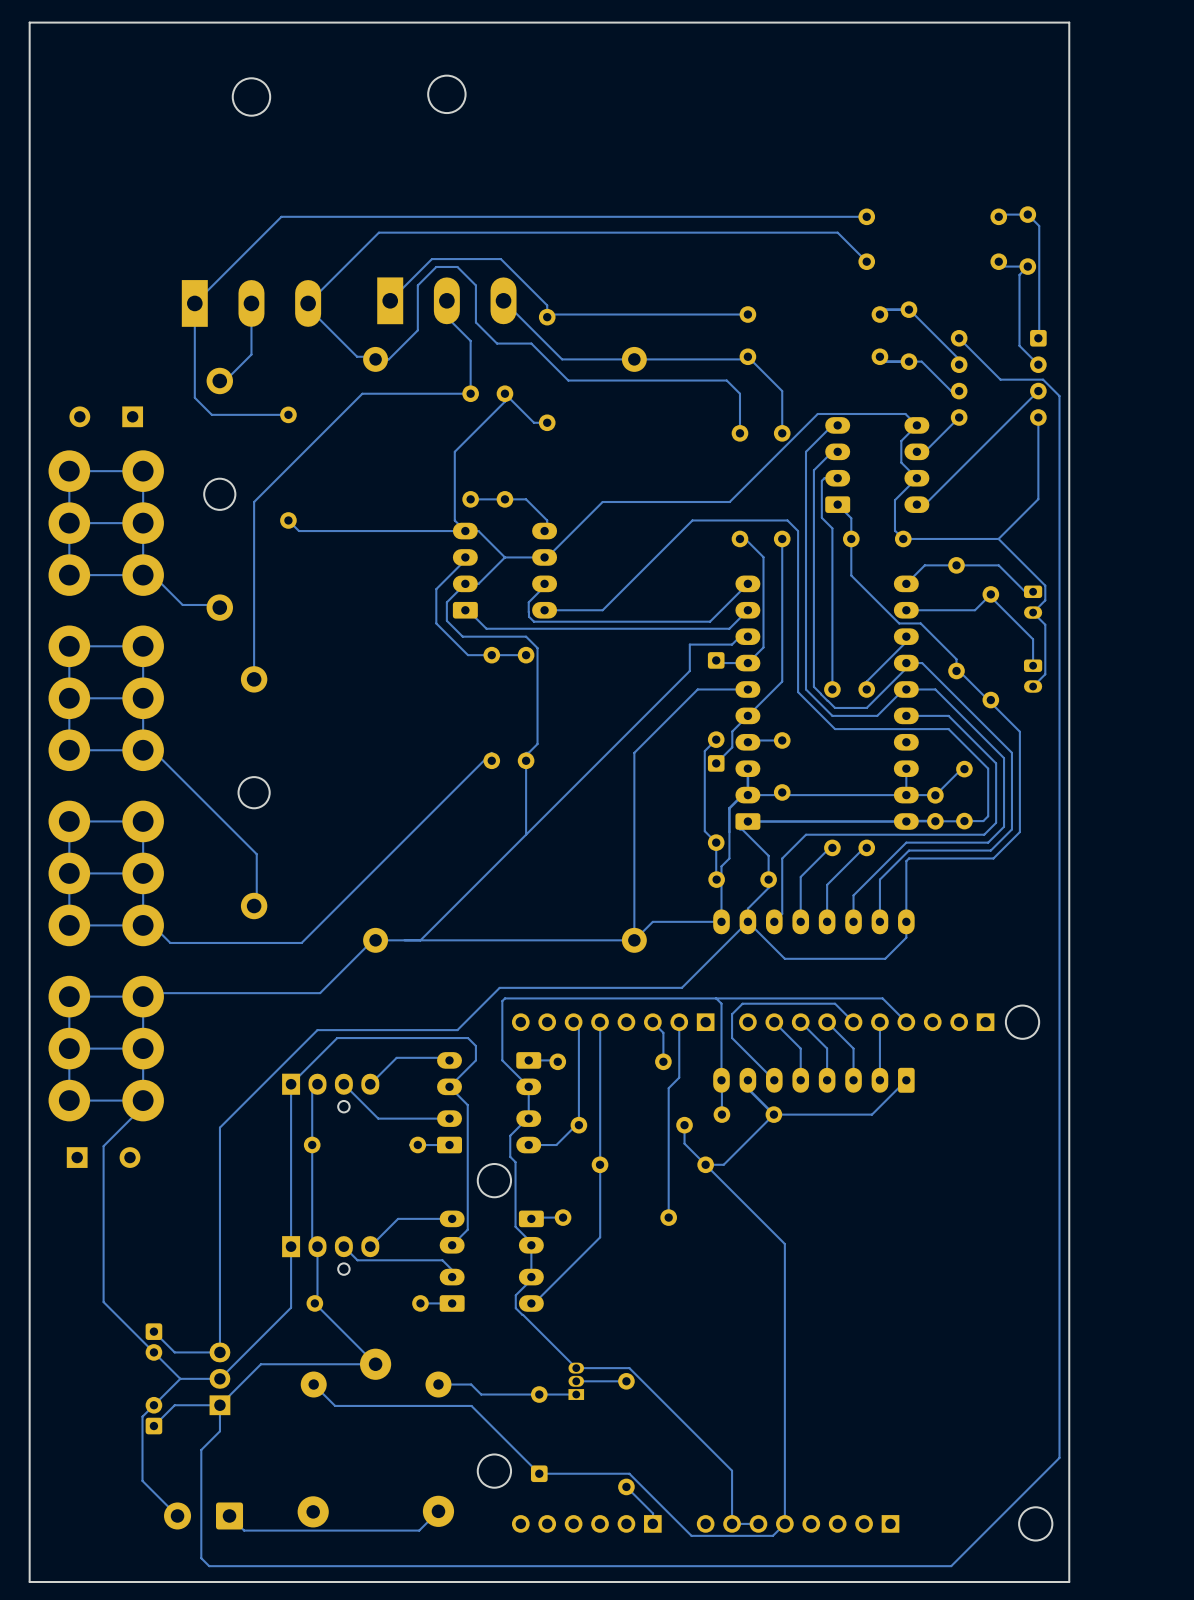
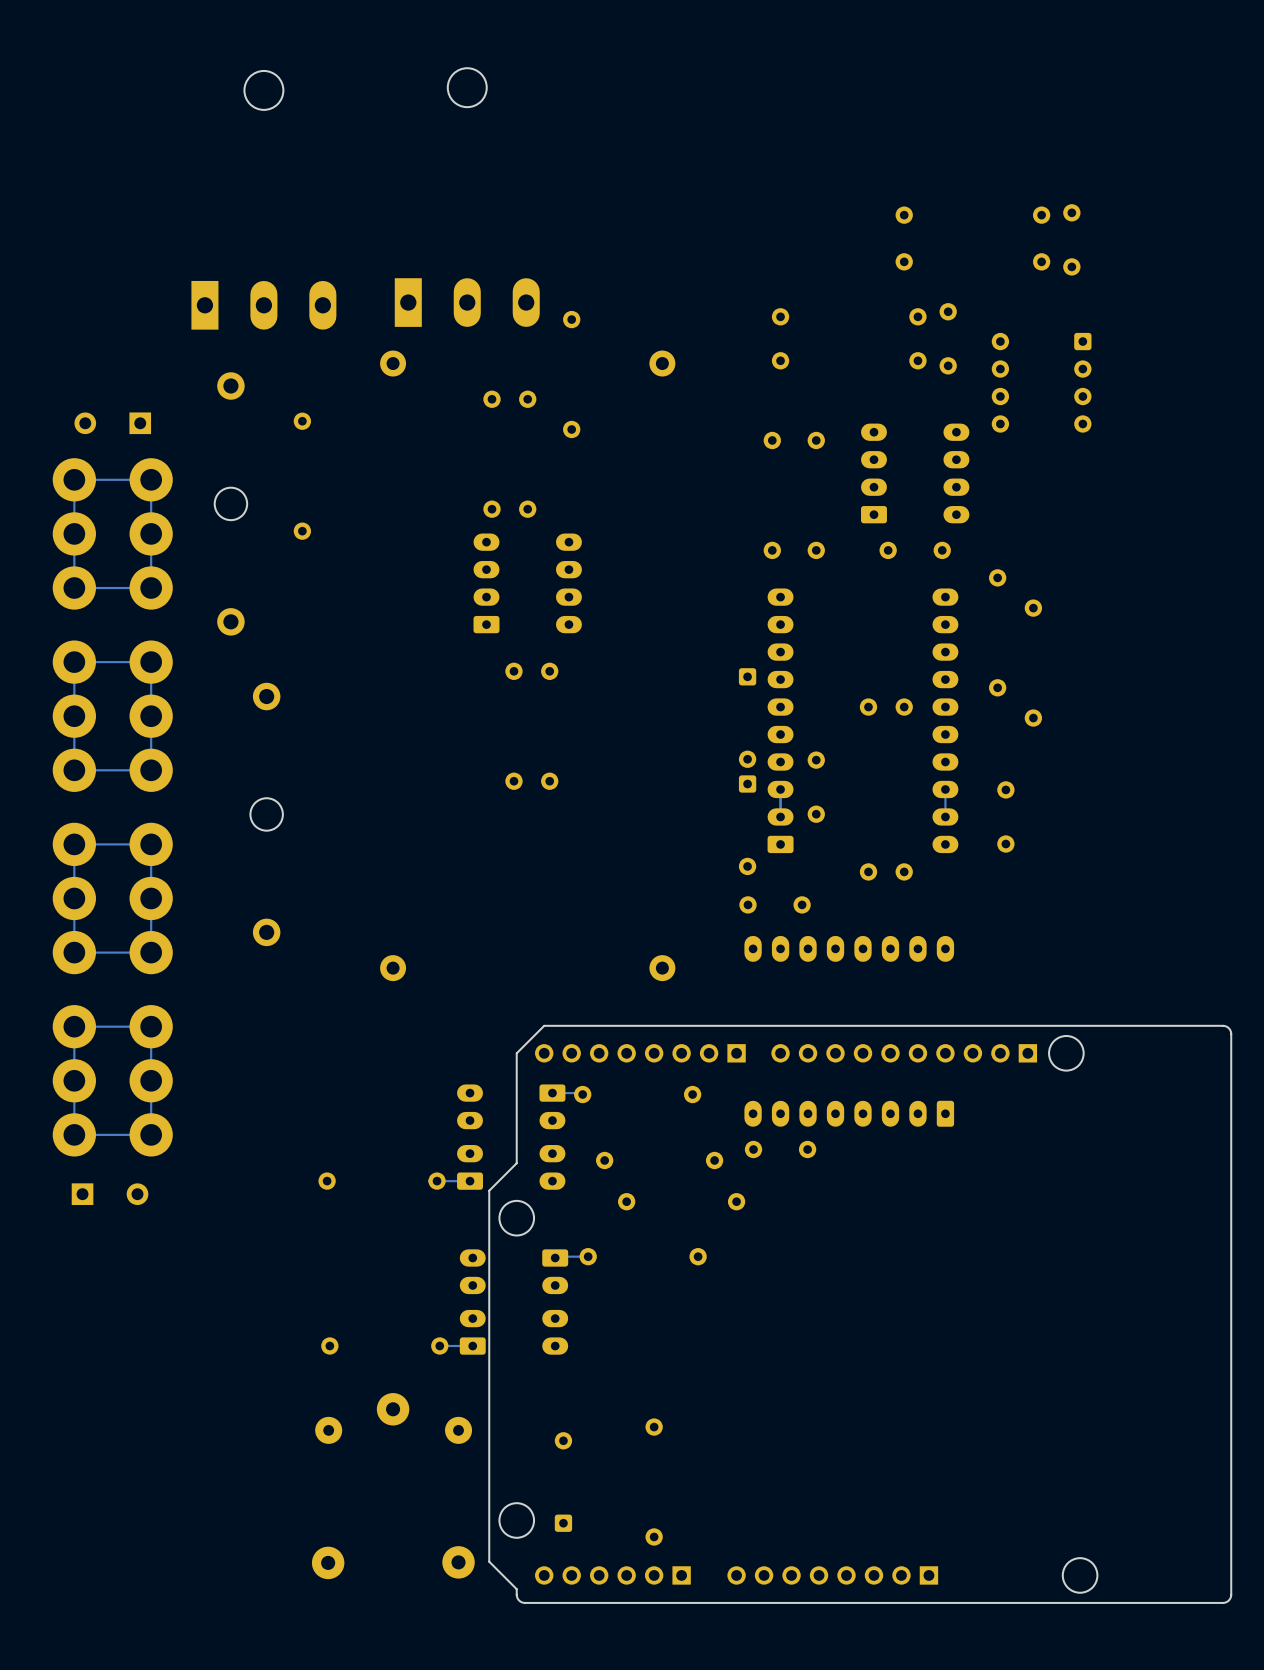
board edge: (1069, 22) (29, 22) (29, 1582) (1069, 1582) (1069, 22) -> none
track: (866, 216) (281, 216) (194, 303) (194, 397) (211, 414) (288, 414) -> none
track: (998, 216) (1000, 214) (1027, 214) (1039, 226) (1038, 338) -> none
track: (866, 261) (837, 232) (378, 232) (308, 303) (308, 307) (357, 356) (378, 356) -> none
track: (998, 261) (1003, 266) (1027, 266) (1019, 274) (1019, 345) (1038, 364) -> none
track: (390, 300) (431, 259) (500, 259) (547, 305) (547, 317) (549, 314) (747, 314) -> none
track: (446, 300) (446, 317) (470, 340) (470, 393) (362, 393) (254, 501) (254, 679) (256, 679) -> none
track: (503, 300) (562, 359) (750, 359) (782, 391) (782, 433) -> none
track: (251, 303) (251, 354) (227, 378) -> none
track: (882, 309) (909, 309) (959, 359) (959, 364) -> none
track: (959, 338) (1000, 379) (1043, 379) (1059, 396) (1059, 1457) (951, 1566) (209, 1566) (201, 1558) (201, 1449) (219, 1431) (219, 1405) -> none
track: (375, 359) (388, 359) (417, 330) (417, 285) (436, 266) (457, 266) (475, 285) (475, 322) (497, 343) (531, 343) (568, 380) (726, 380) (739, 393) (739, 433) -> none
track: (882, 361) (921, 361) (951, 391) (959, 391) -> none
track: (1038, 391) (924, 504) (916, 504) -> none
track: (959, 417) (924, 451) (916, 451) -> none
track: (1038, 417) (1038, 499) (998, 538) -> none
track: (547, 422) (534, 422) (504, 393) (504, 401) (454, 451) (454, 520) (465, 531) -> none
track: (837, 425) (832, 425) (806, 451) (806, 689) (832, 715) (877, 715) (903, 689) (935, 689) (1004, 758) (1004, 826) (988, 842) (906, 842) (853, 895) (853, 921) -> none
track: (837, 451) (832, 451) (813, 470) (813, 686) (835, 707) (866, 707) (906, 668) (906, 663) (922, 663) (1011, 752) (1011, 829) (990, 850) (908, 850) (879, 879) (879, 921) -> none
track: (837, 478) (824, 478) (821, 480) (821, 517) (832, 528) (832, 689) -> none
track: (470, 499) (526, 499) (547, 520) (547, 531) -> none
track: (837, 504) (851, 518) (851, 575) (899, 623) (920, 623) (956, 659) (956, 670) -> none
track: (288, 520) (299, 531) (478, 531) (504, 557) -> none
track: (143, 523) (69, 523) -> none
track: (745, 538) (763, 557) (763, 647) (747, 663) (718, 663) (716, 660) -> none
track: (782, 538) (782, 681) (732, 731) (732, 747) (716, 763) -> none
track: (998, 538) (903, 538) (894, 530) (894, 500) (916, 478) (901, 462) (901, 441) (916, 425) (905, 413) (817, 413) (729, 501) (602, 501) (547, 557) (504, 557) -> none
track: (998, 538) (1045, 585) (1045, 600) (1033, 612) (1045, 624) (1045, 674) (1033, 686) -> none
track: (468, 557) (436, 589) (436, 623) (468, 655) (526, 655) -> none
track: (504, 557) (478, 583) (465, 583) (446, 602) (446, 620) (462, 636) (526, 636) (537, 648) (537, 744) (528, 752) (526, 752) -> none
track: (151, 573) (182, 604) (227, 604) -> none
track: (747, 583) (710, 621) (533, 621) (528, 616) (528, 602) (547, 583) -> none
track: (906, 583) (924, 565) (998, 565) (1025, 591) (1033, 591) -> none
part: (1033, 602) -> none
track: (547, 610) (602, 610) (692, 520) (787, 520) (798, 531) (798, 692) (835, 729) (948, 729) (988, 768) (988, 816) (983, 821) (935, 821) -> none
track: (747, 610) (729, 628) (486, 628) (468, 610) -> none
track: (906, 610) (975, 610) (989, 595) (1033, 639) (1033, 665) -> none
track: (747, 636) (739, 636) (732, 644) (689, 644) (689, 670) (420, 940) -> none
track: (906, 636) (906, 641) (866, 681) (866, 689) -> none
track: (953, 673) (961, 673) (1019, 731) (1019, 832) (993, 858) (908, 858) (906, 861) (906, 937) (885, 958) (784, 958) (747, 921) -> none
part: (1033, 676) -> none
track: (747, 689) (697, 689) (634, 752) (634, 929) (623, 940) -> none
track: (143, 698) (69, 698) -> none
track: (906, 715) (948, 715) (996, 763) (996, 822) (984, 834) (806, 834) (782, 858) (782, 913) (774, 921) -> none
track: (716, 739) (704, 751) (704, 831) (716, 842) (716, 879) -> none
track: (782, 740) (749, 740) (747, 742) -> none
track: (151, 748) (256, 854) (256, 906) -> none
track: (491, 752) (301, 942) (170, 942) (151, 923) -> none
track: (526, 760) (526, 834) -> none
track: (964, 769) (961, 769) (935, 795) -> none
track: (937, 795) (747, 795) (745, 797) (740, 797) (729, 808) (729, 858) (721, 866) (721, 921) (652, 921) (634, 940) (372, 940) (320, 993) (152, 993) (151, 994) -> none
part: (935, 808) -> none
track: (937, 821) (747, 821) (739, 829) (742, 829) (768, 855) (768, 887) (747, 908) (747, 921) -> none
track: (832, 845) (800, 876) (800, 921) -> none
track: (866, 845) (827, 884) (827, 921) -> none
track: (143, 873) (69, 873) -> none
track: (747, 921) (681, 987) (499, 987) (457, 1030) (317, 1030) (219, 1127) (219, 1352) (174, 1352) (153, 1331) -> none
board edge: none -> (1223, 1025) (544, 1025) (516, 1053) (516, 1163) (489, 1190) (489, 1561) (516, 1589) (518, 1599) (524, 1602) (1223, 1602) (1228, 1601) (1231, 1594) (1231, 1034) (1228, 1028) (1223, 1025)
track: (716, 998) (721, 1003) (721, 1114) -> none
track: (573, 1022) (578, 1027) (578, 1122) (556, 1145) (534, 1145) -> none
track: (600, 1022) (600, 1237) (534, 1303) -> none
track: (653, 1022) (663, 1032) (663, 1061) -> none
track: (679, 1022) (679, 1077) (668, 1088) (668, 1217) -> none
track: (774, 1022) (800, 1048) (800, 1080) -> none
track: (801, 1022) (827, 1048) (827, 1080) -> none
track: (827, 1022) (853, 1048) (853, 1080) -> none
track: (853, 1022) (835, 1003) (742, 1003) (732, 1014) (732, 1038) (774, 1080) -> none
track: (879, 1022) (879, 1080) -> none
track: (906, 1022) (882, 998) (504, 998) (502, 1001) (502, 1060) (528, 1086) -> none
track: (143, 1048) (69, 1048) -> none
track: (449, 1057) (396, 1057) (370, 1084) -> none
track: (906, 1080) (872, 1114) (773, 1114) -> none
track: (317, 1084) (312, 1089) (312, 1241) (317, 1246) (317, 1300) -> none
track: (343, 1084) (378, 1118) (449, 1118) -> none
track: (534, 1086) (528, 1092) (528, 1117) (510, 1135) (510, 1156) (515, 1162) (515, 1226) (531, 1242) (531, 1279) (515, 1295) (515, 1308) (576, 1368) (629, 1368) (732, 1470) (732, 1523) (758, 1523) -> none
track: (747, 1088) (773, 1114) -> none
part: (330, 1093) -> none
track: (151, 1098) (103, 1146) (103, 1302) (180, 1378) -> none
track: (773, 1114) (723, 1164) (705, 1164) -> none
track: (684, 1125) (684, 1143) (784, 1244) (784, 1523) (772, 1535) (691, 1535) (629, 1473) (539, 1473) (471, 1405) (335, 1405) (313, 1384) -> none
track: (452, 1218) (398, 1218) (370, 1246) -> none
track: (452, 1245) (467, 1229) (467, 1105) (449, 1086) (475, 1060) (475, 1045) (468, 1038) (337, 1038) (291, 1084) (291, 1307) (219, 1378) (180, 1378) -> none
track: (343, 1246) (357, 1260) (442, 1260) (452, 1269) (452, 1277) -> none
part: (330, 1255) -> none
track: (314, 1303) (375, 1364) -> none
part: (153, 1342) -> none
track: (375, 1364) (260, 1364) (219, 1405) -> none
track: (180, 1378) (142, 1416) (142, 1480) (177, 1515) -> none
part: (219, 1378) -> none
part: (576, 1381) -> none
track: (623, 1381) (576, 1381) -> none
track: (438, 1384) (471, 1384) (481, 1394) (576, 1394) -> none
track: (219, 1405) (174, 1405) (153, 1426) -> none
part: (153, 1415) -> none
track: (626, 1486) (653, 1513) (653, 1524) -> none
track: (438, 1511) (419, 1530) (244, 1530) (229, 1515) -> none
part: (203, 1515) -> none

